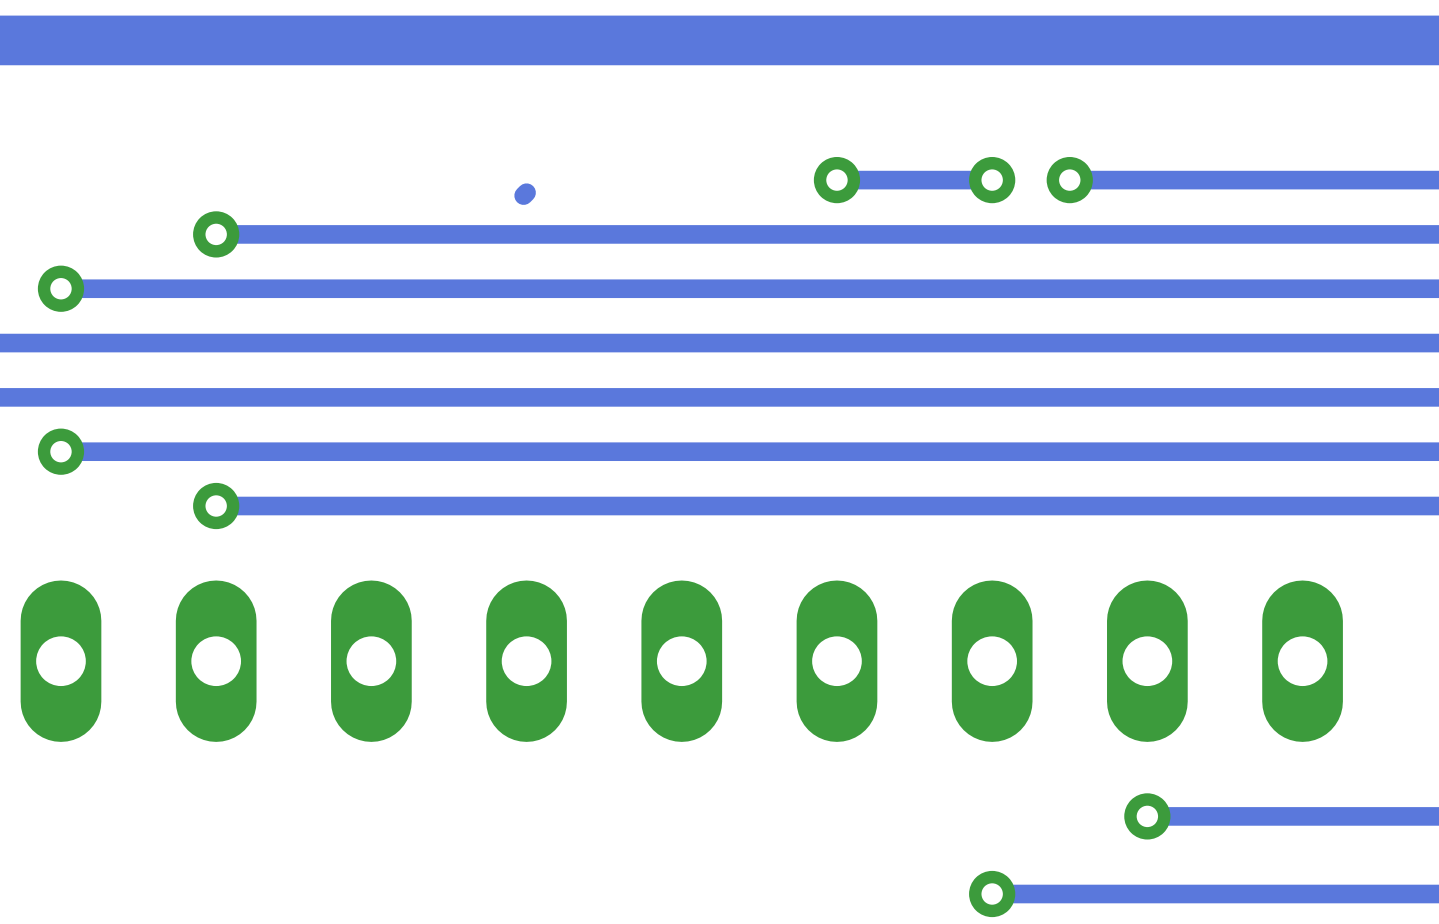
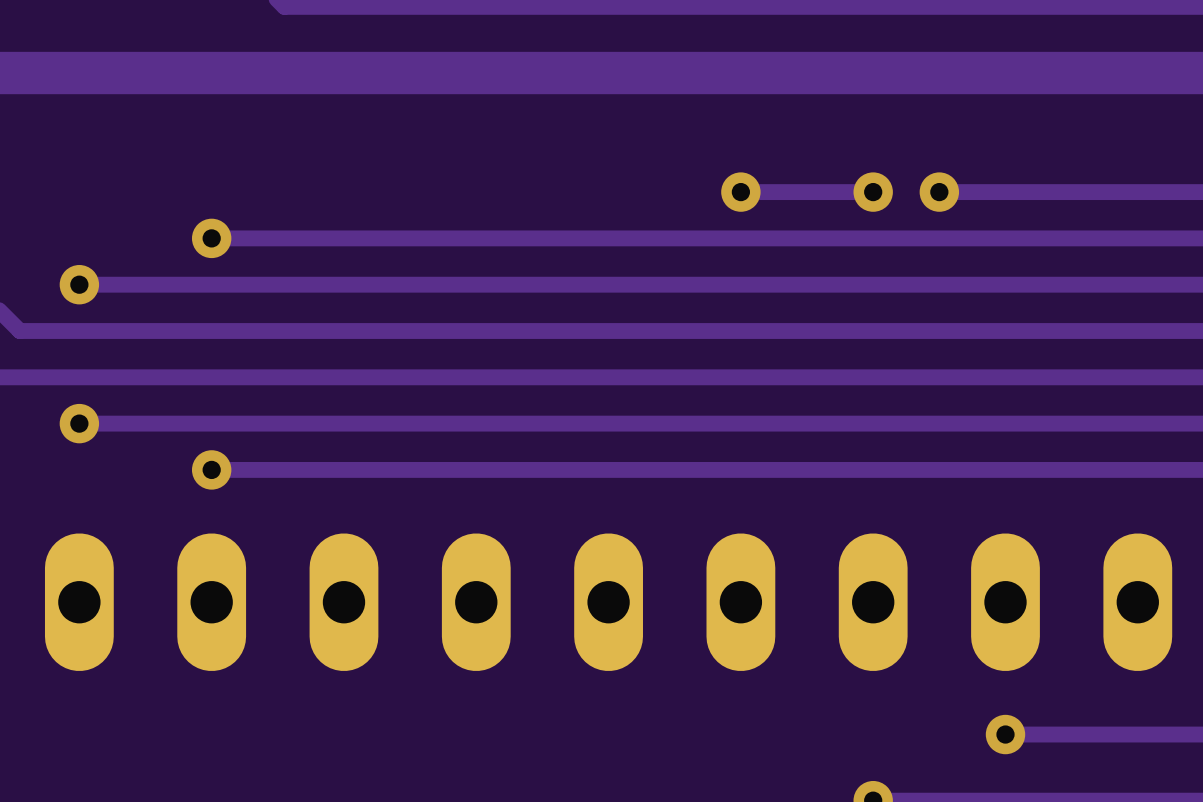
track: (526, 192) (523, 195) -> none

